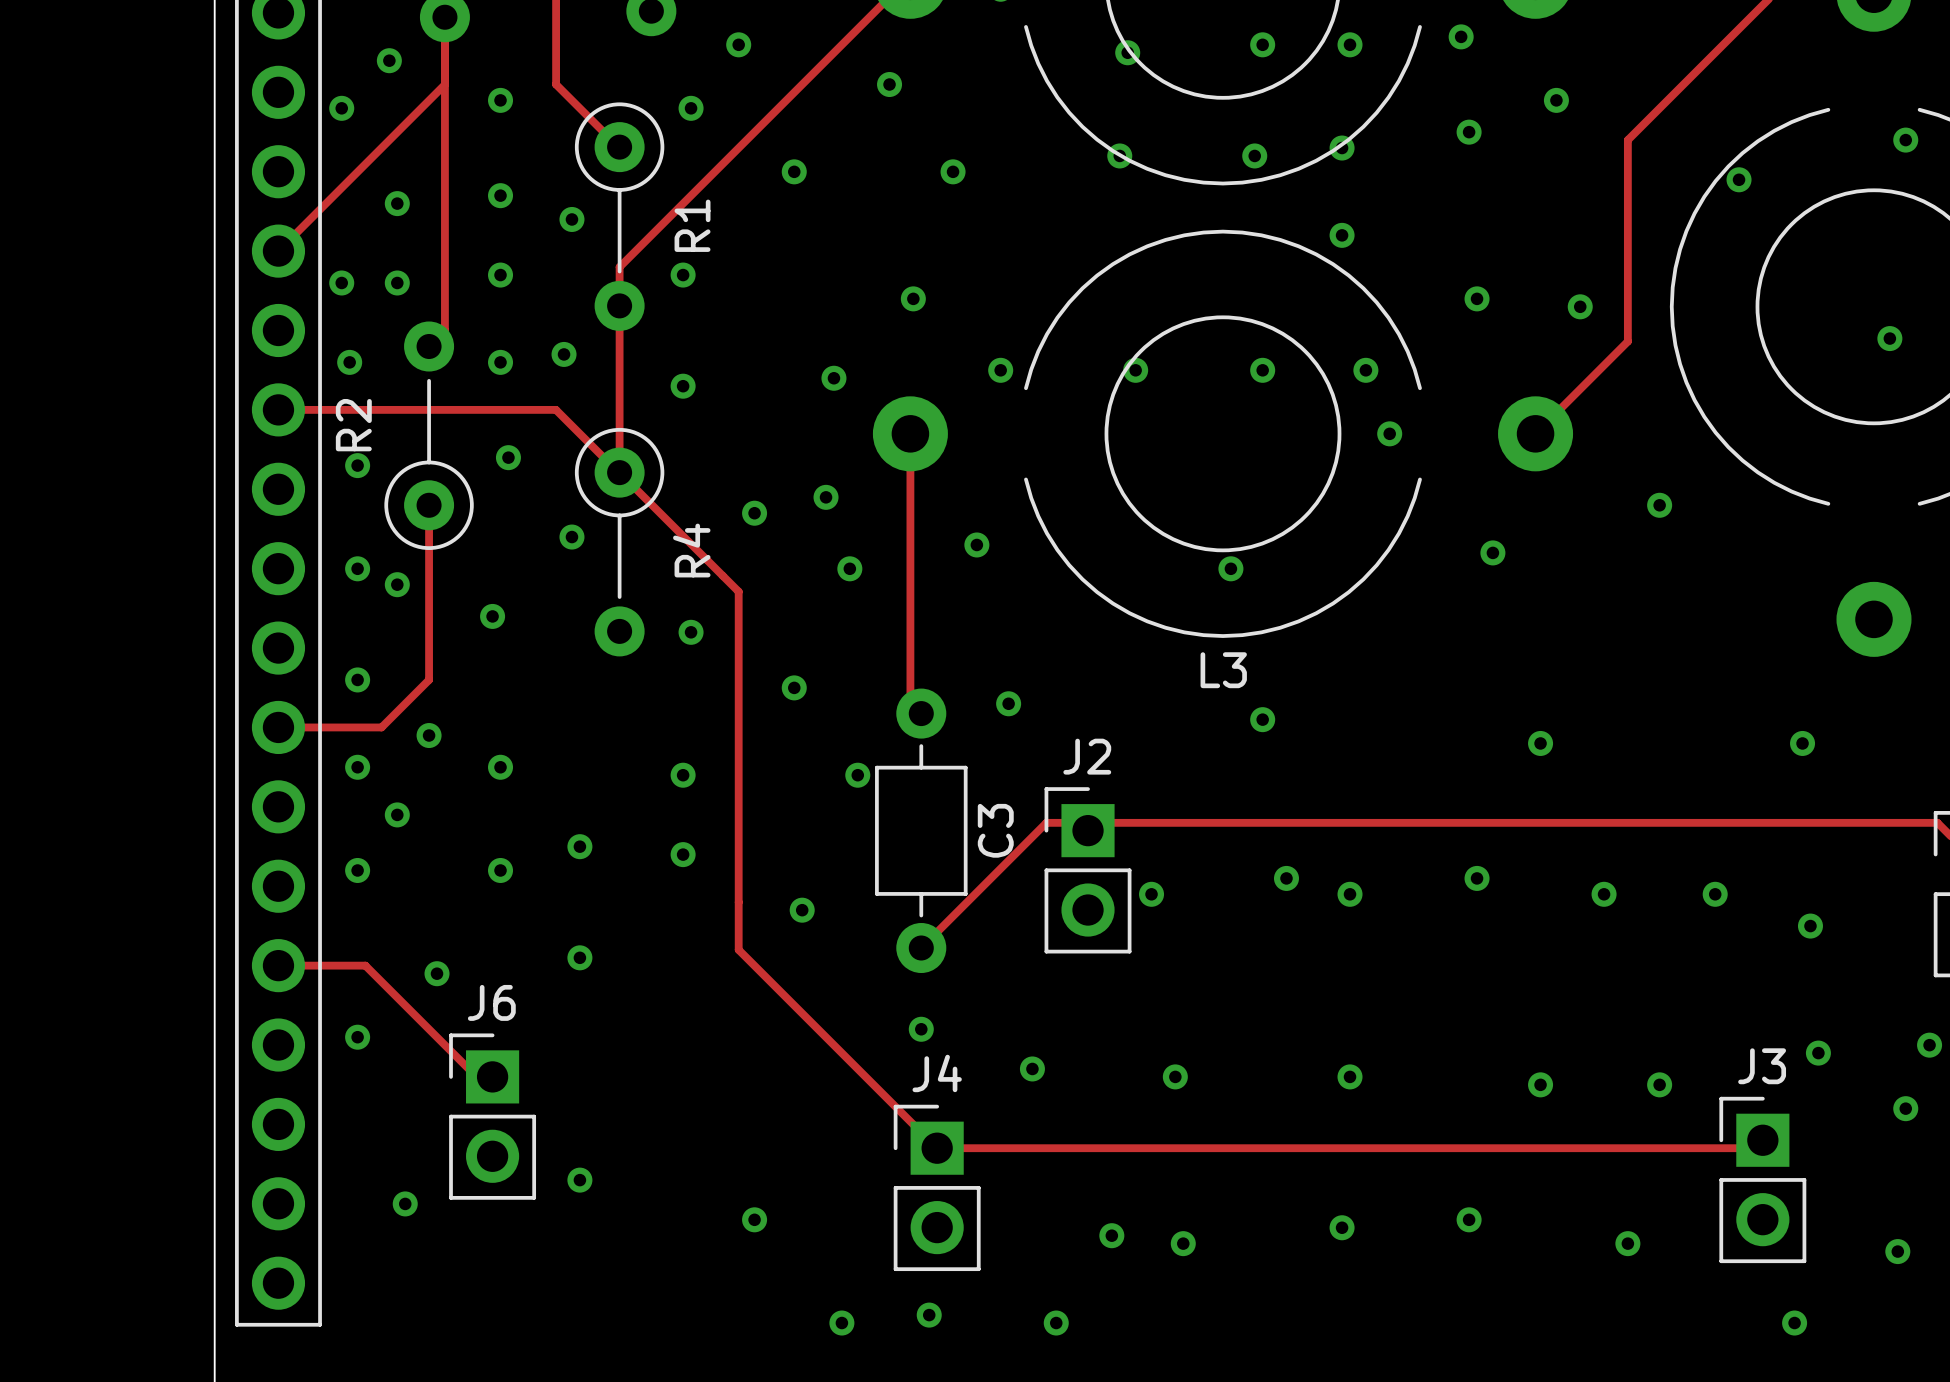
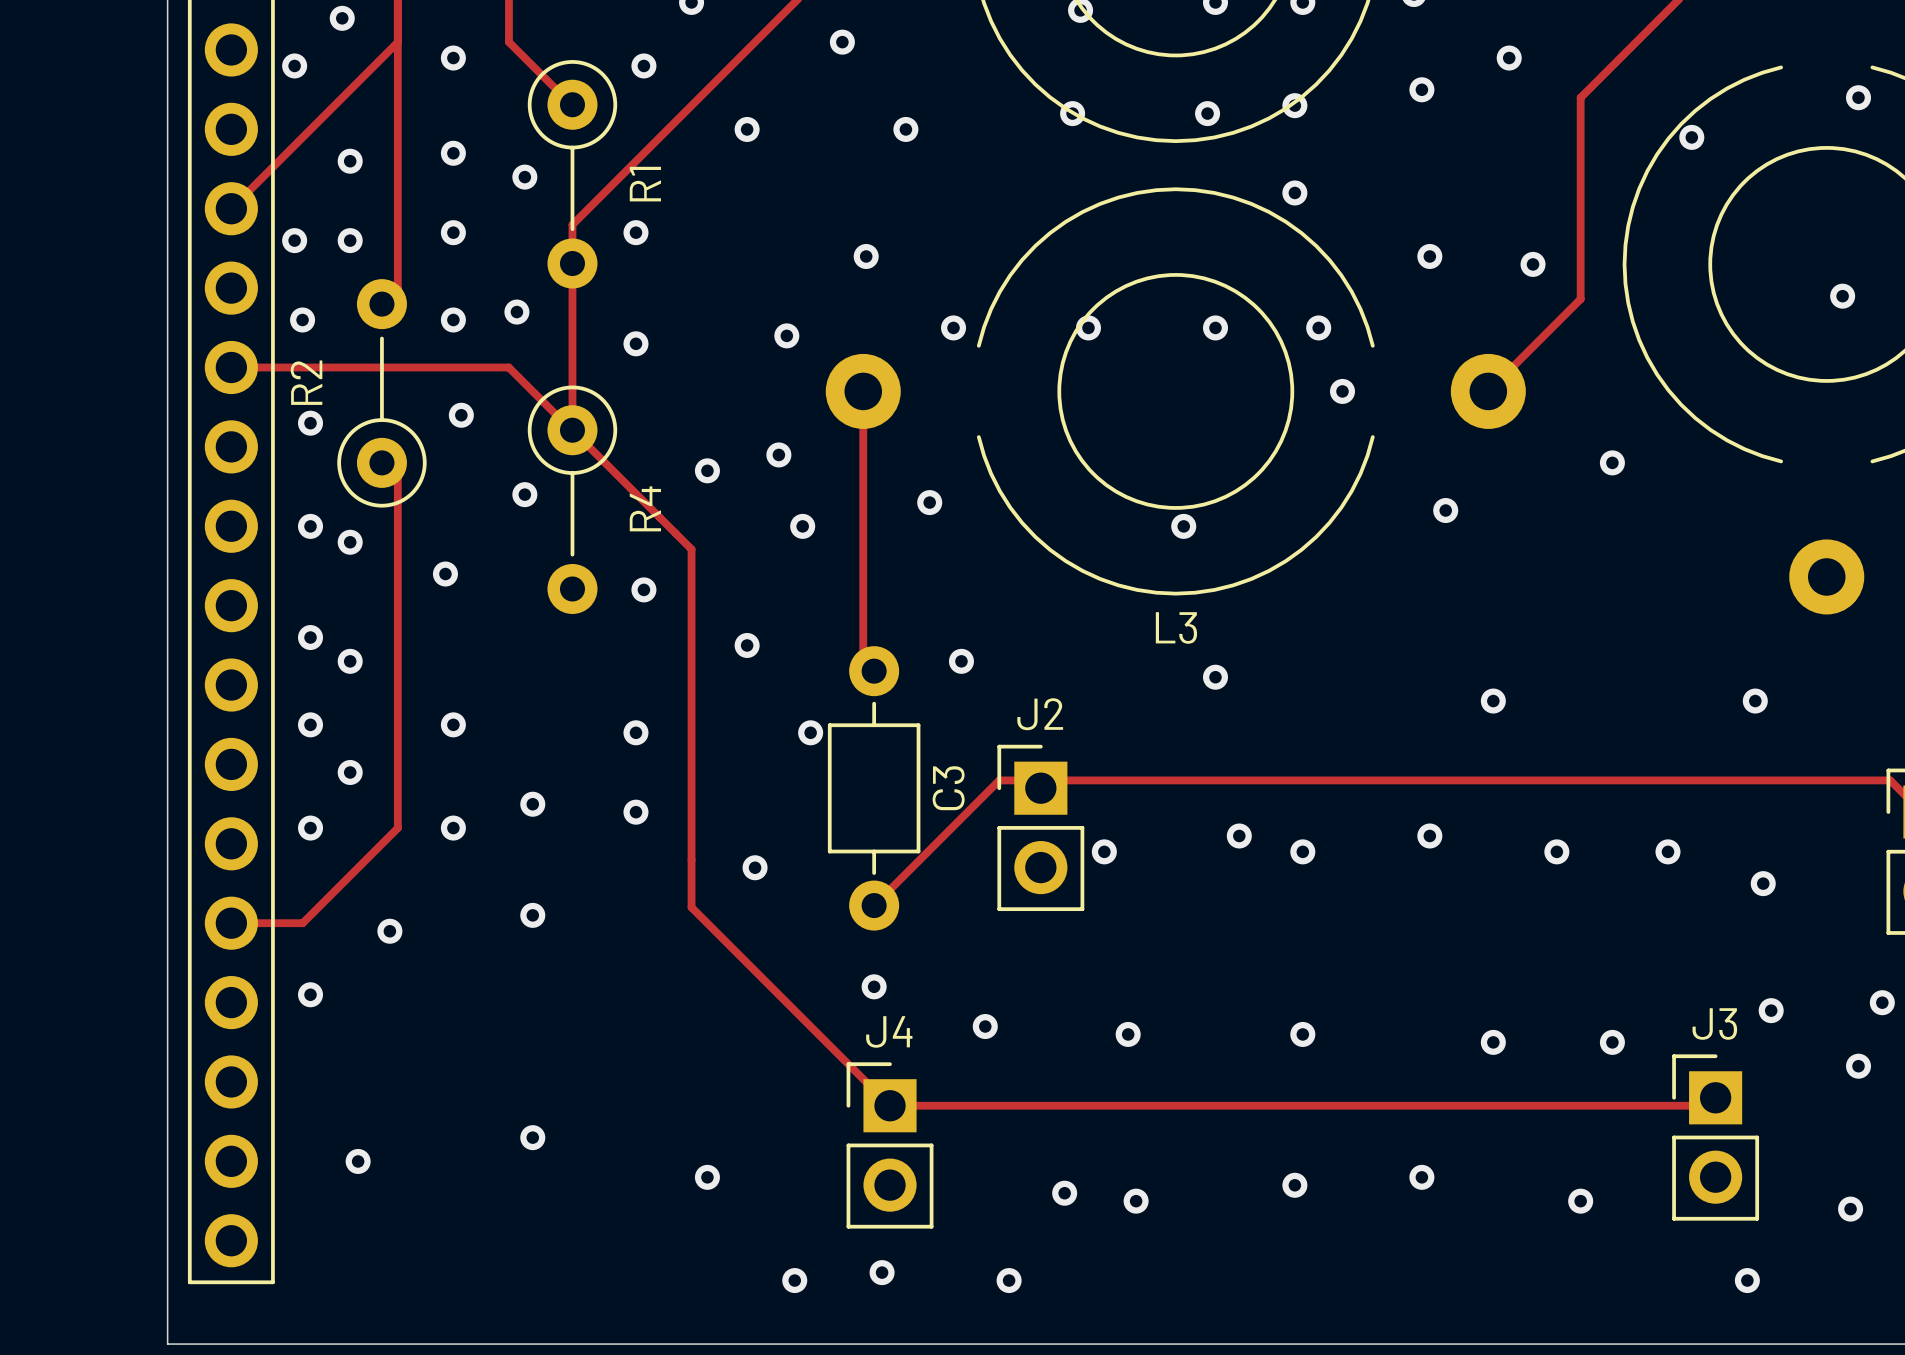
track: (429, 505) (429, 679) (381, 727) (278, 727) -> none
via position: (429, 735) -> (350, 661)
track: (349, 965) (365, 965) (476, 1076) (492, 1076) -> (302, 923) (397, 828) (397, 470) (381, 454)
J6: (492, 1116) -> none

